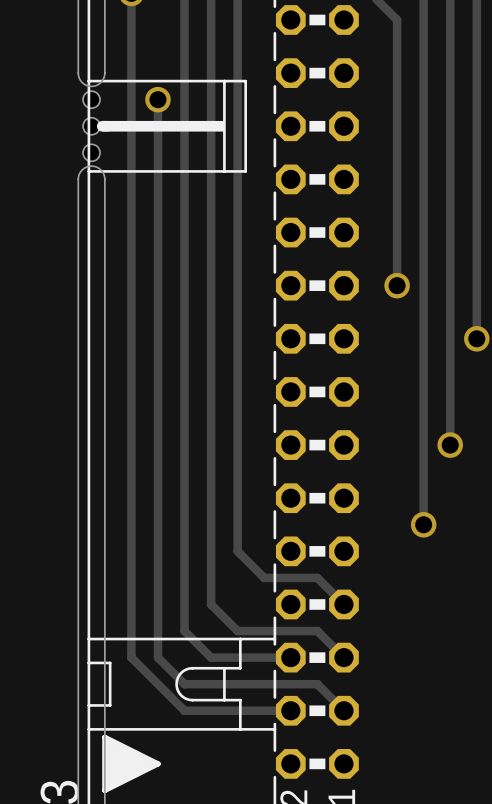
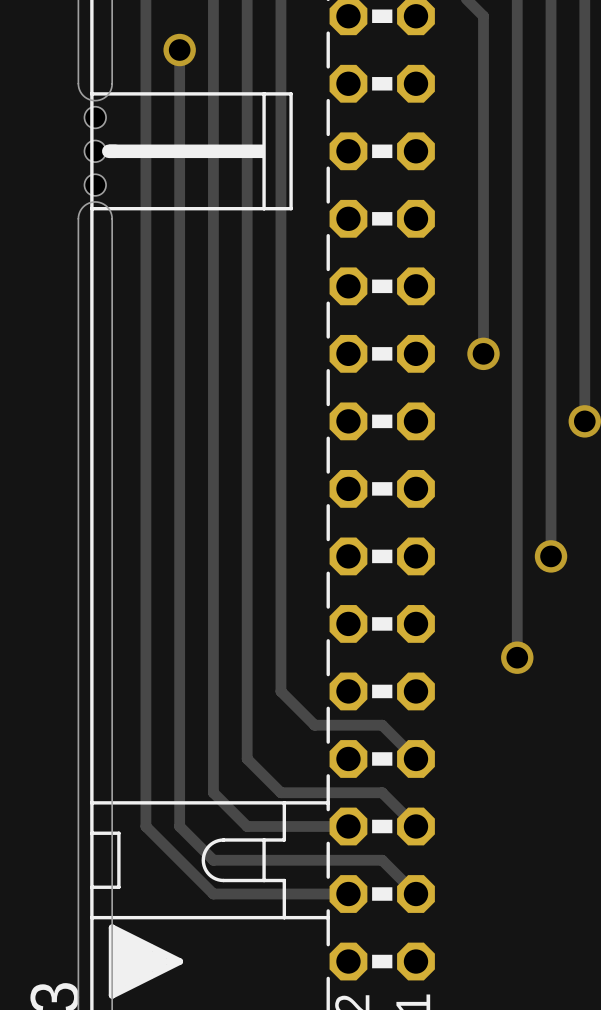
track: none -> (179, 50) (179, 117)
via position: (157, 99) -> (179, 50)

